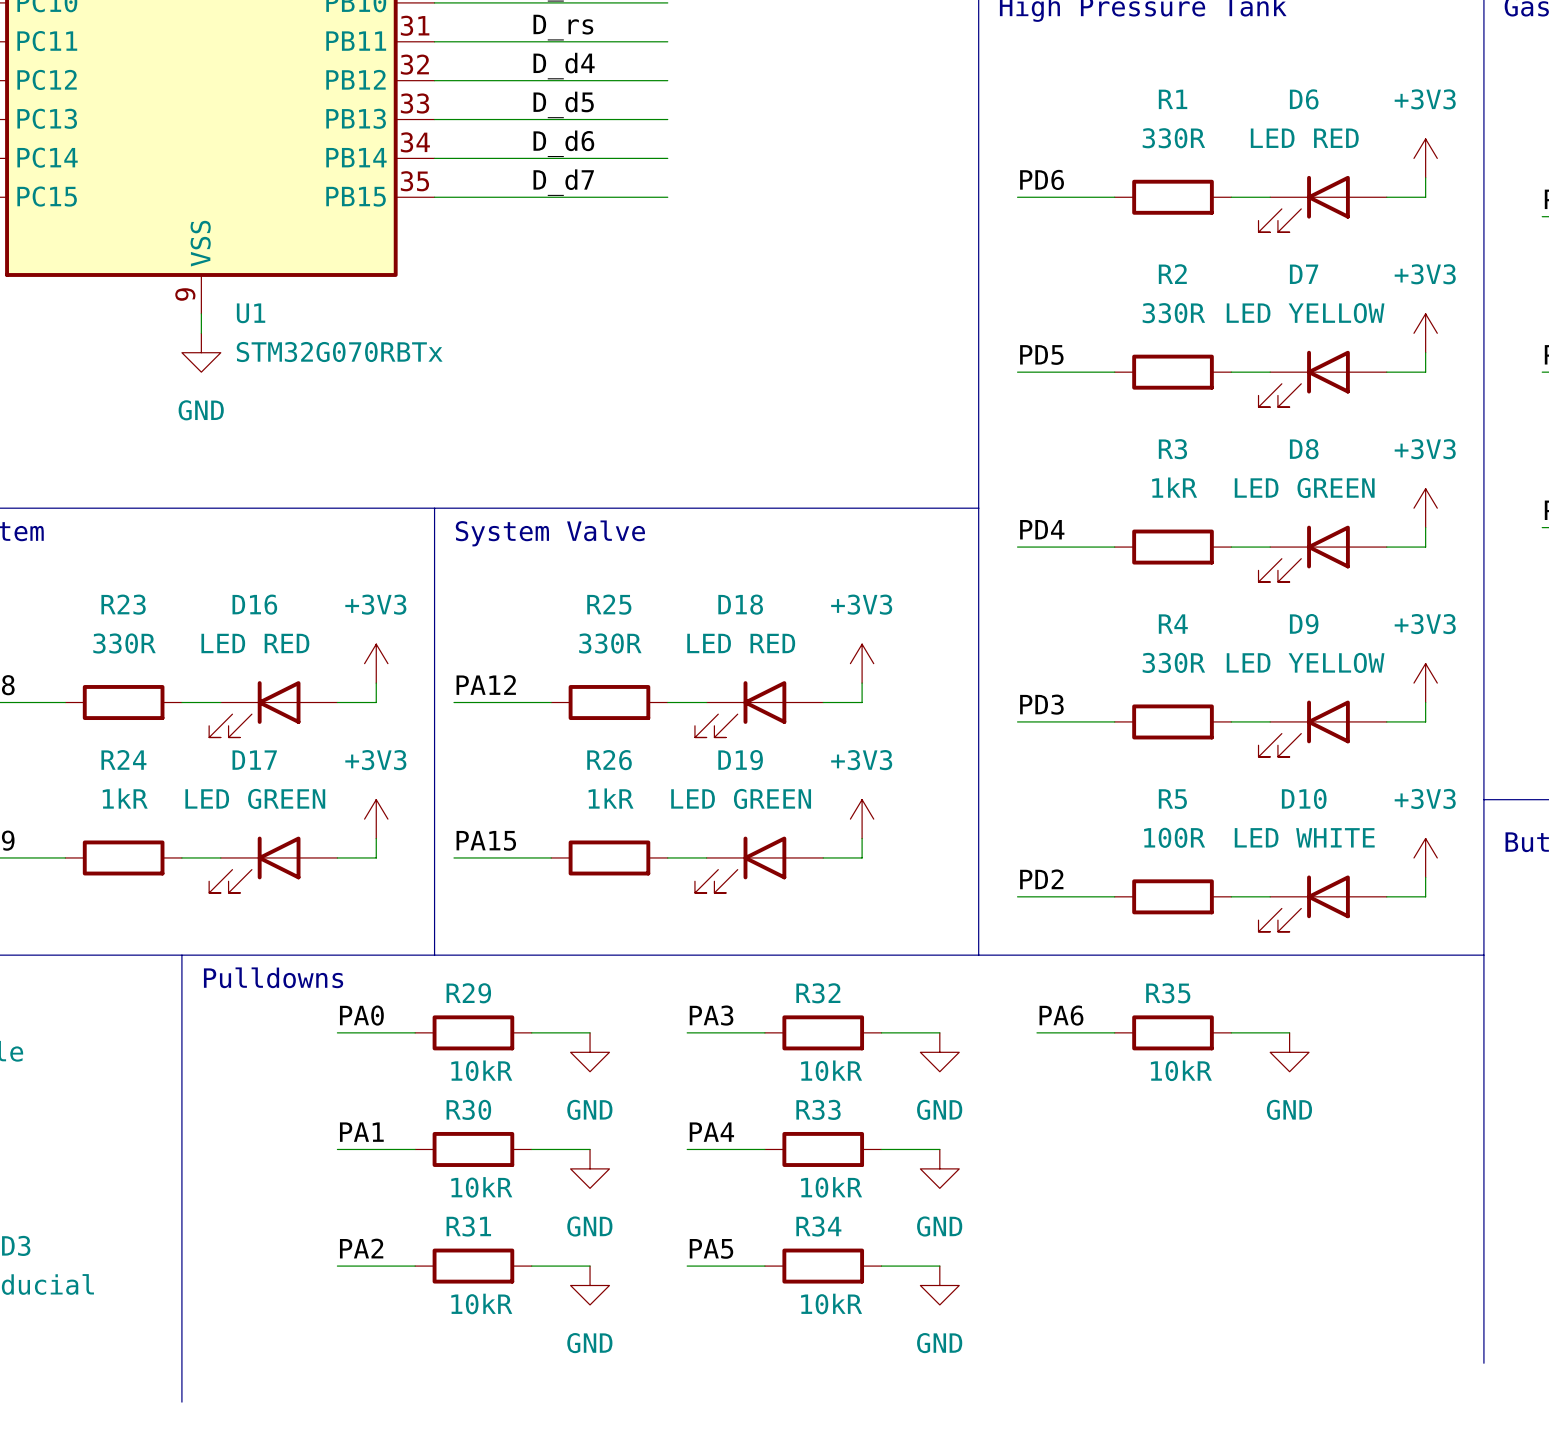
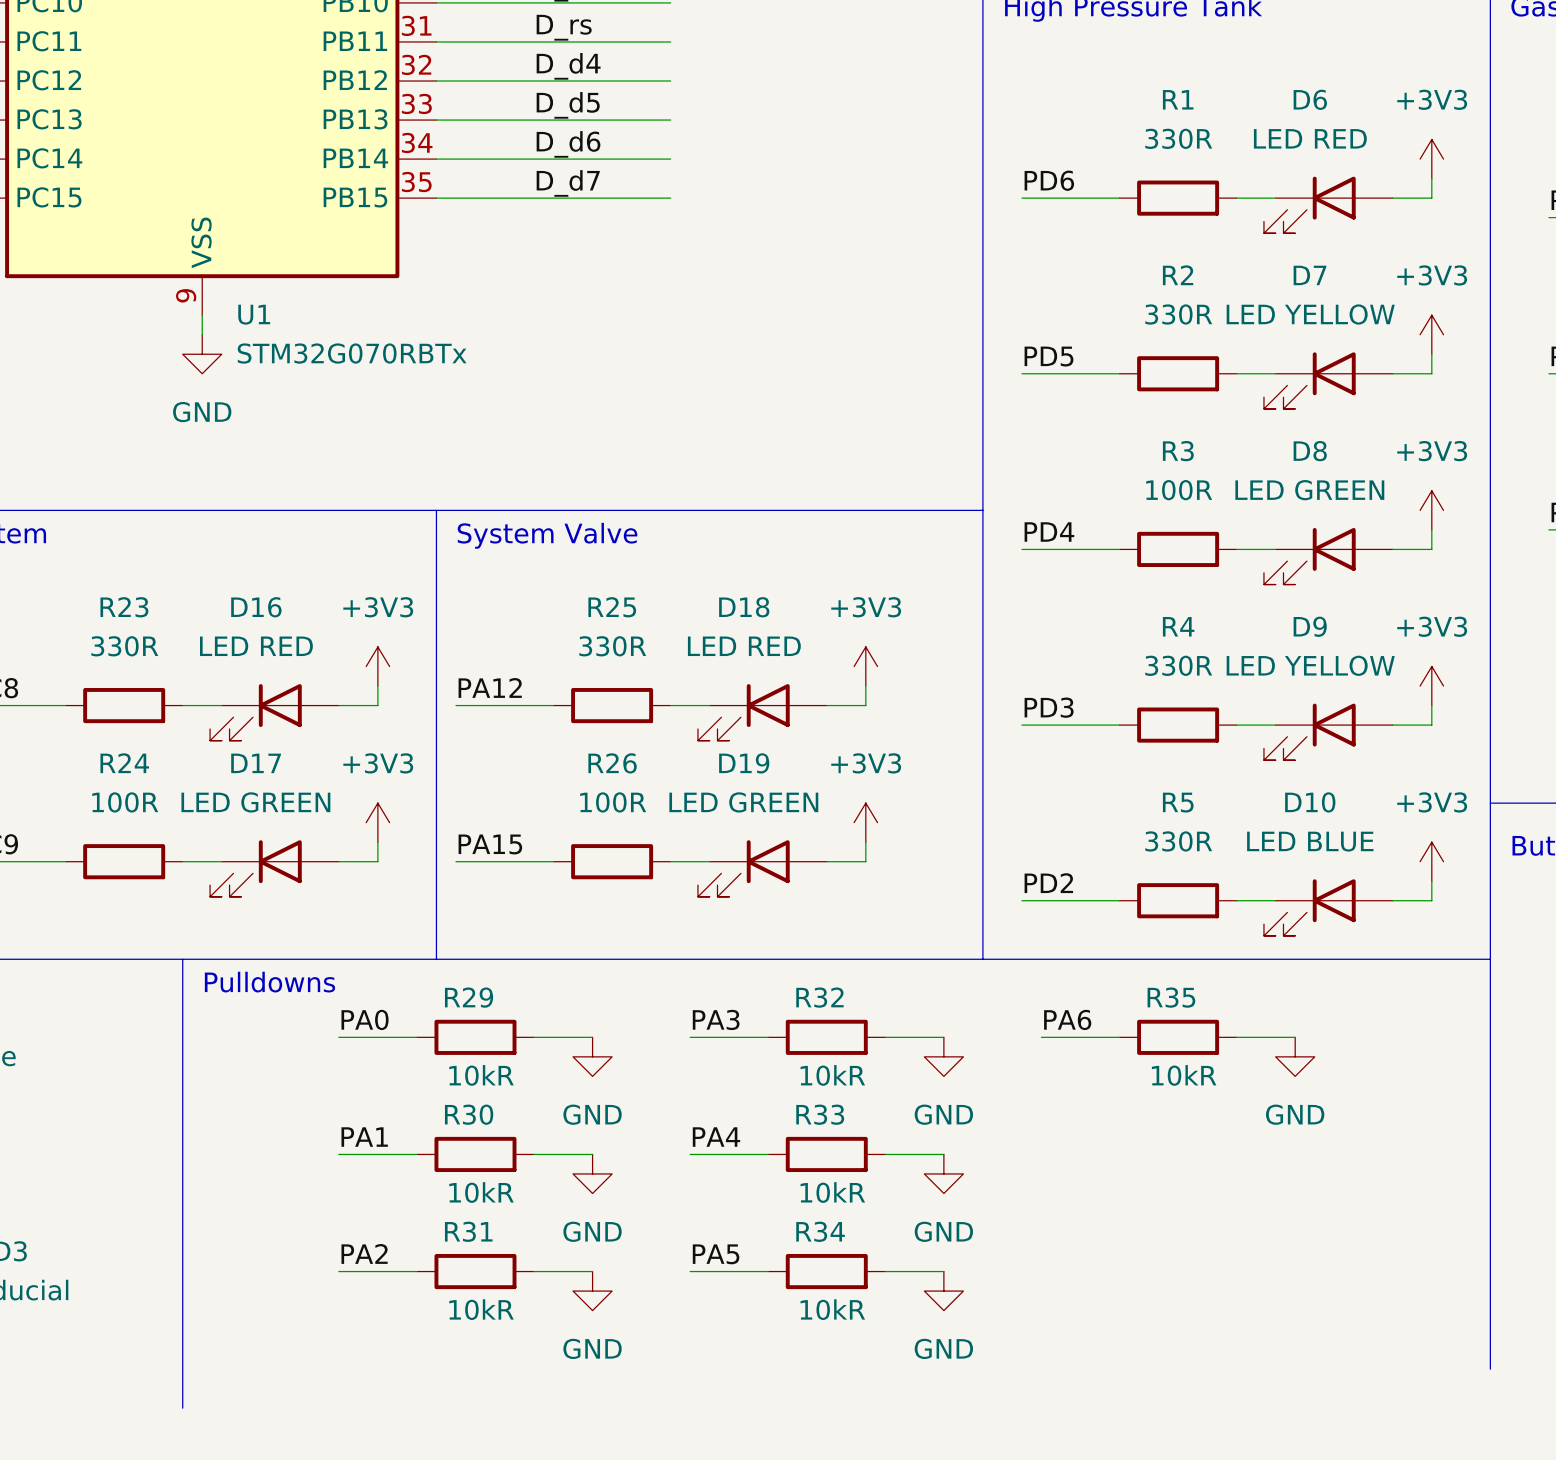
R3 value: 1kR (1174, 487) -> 100R (1179, 490)
R24 value: 1kR (125, 798) -> 100R (125, 802)
R26 value: 1kR (611, 798) -> 100R (613, 802)
R5 value: 100R (1174, 837) -> 330R (1178, 841)
D10 value: LED WHITE (1304, 837) -> LED BLUE (1310, 841)

